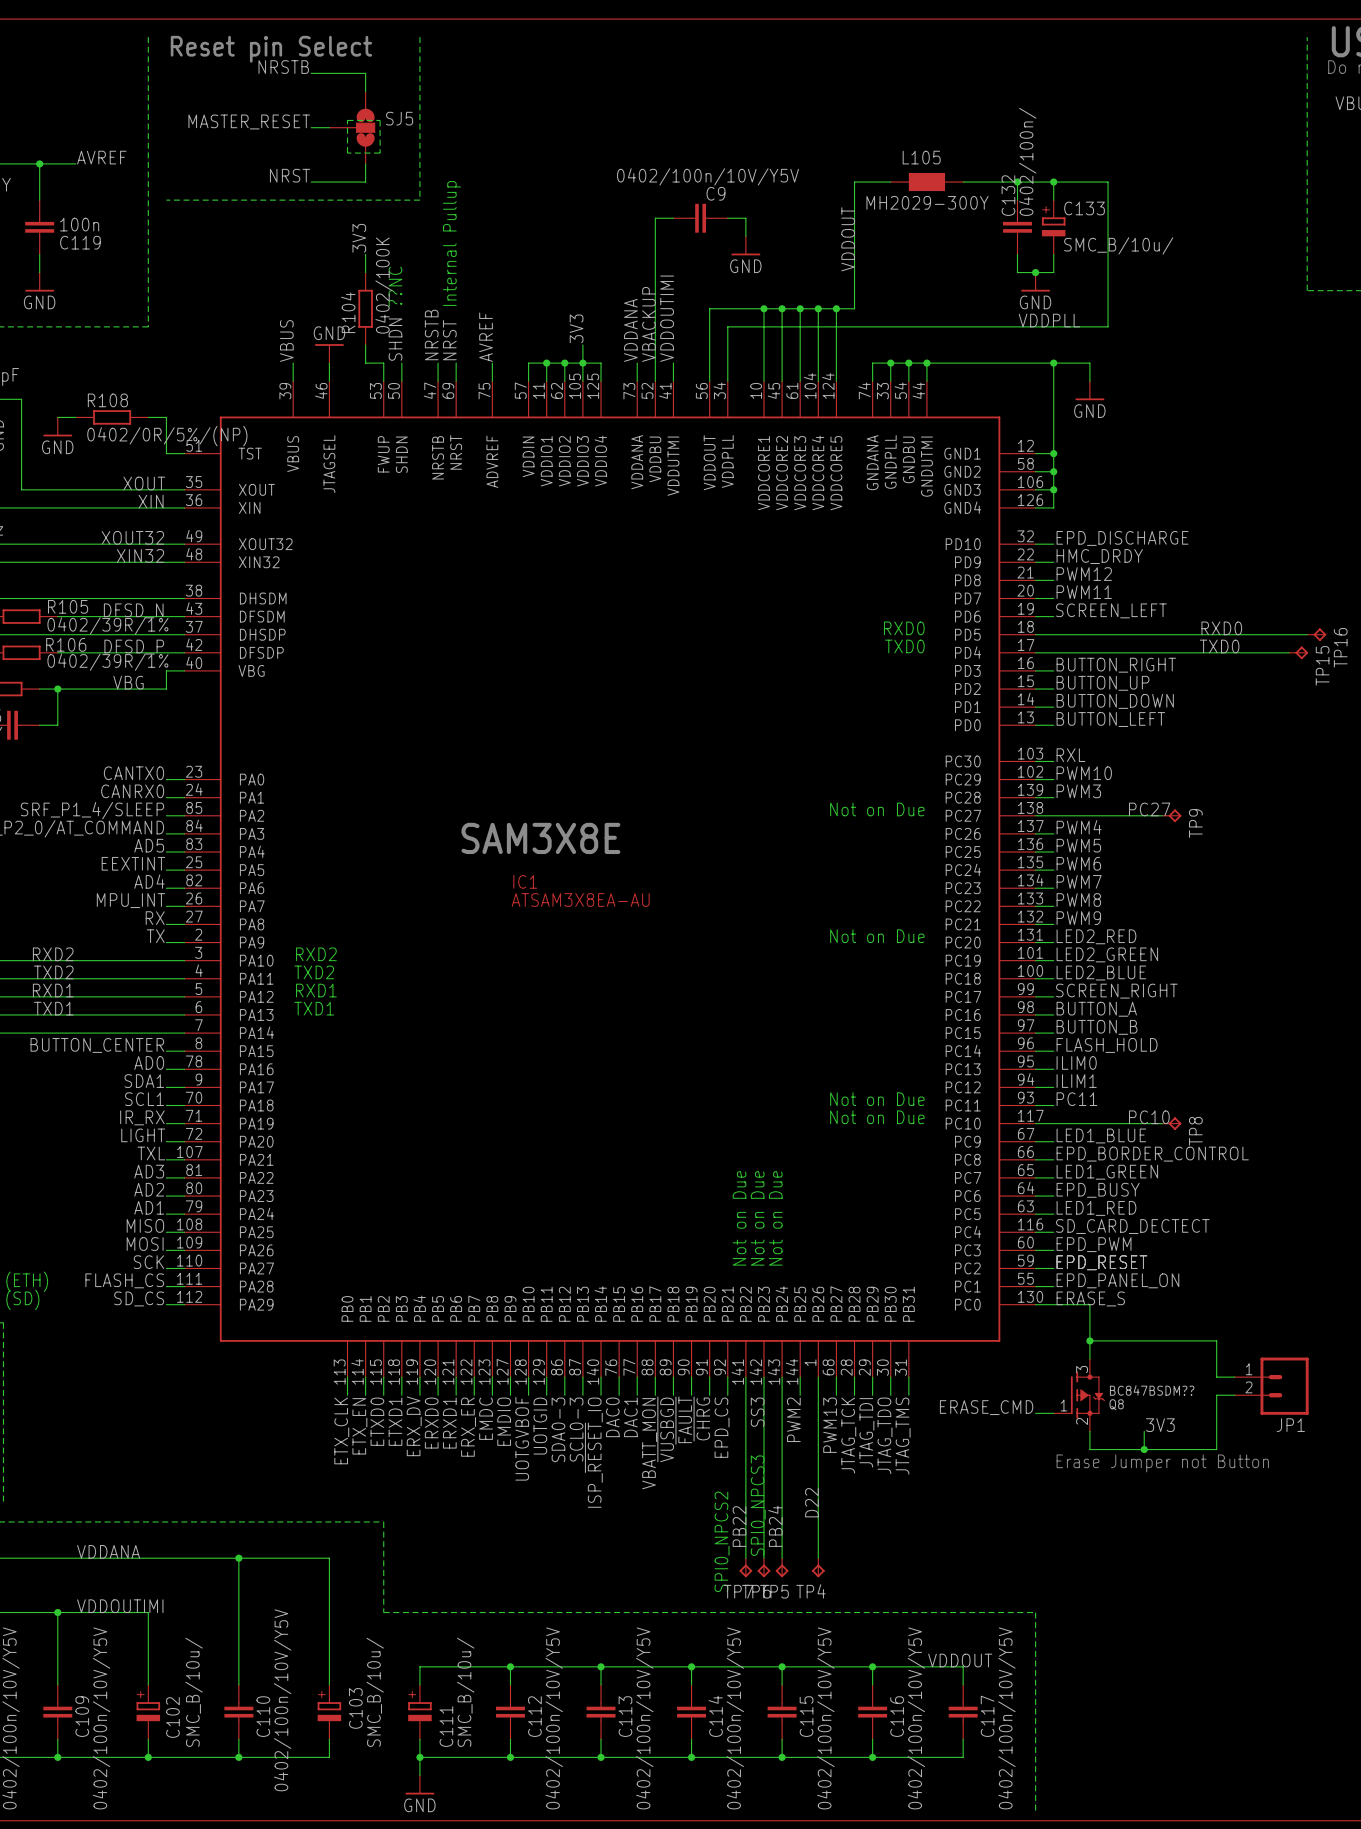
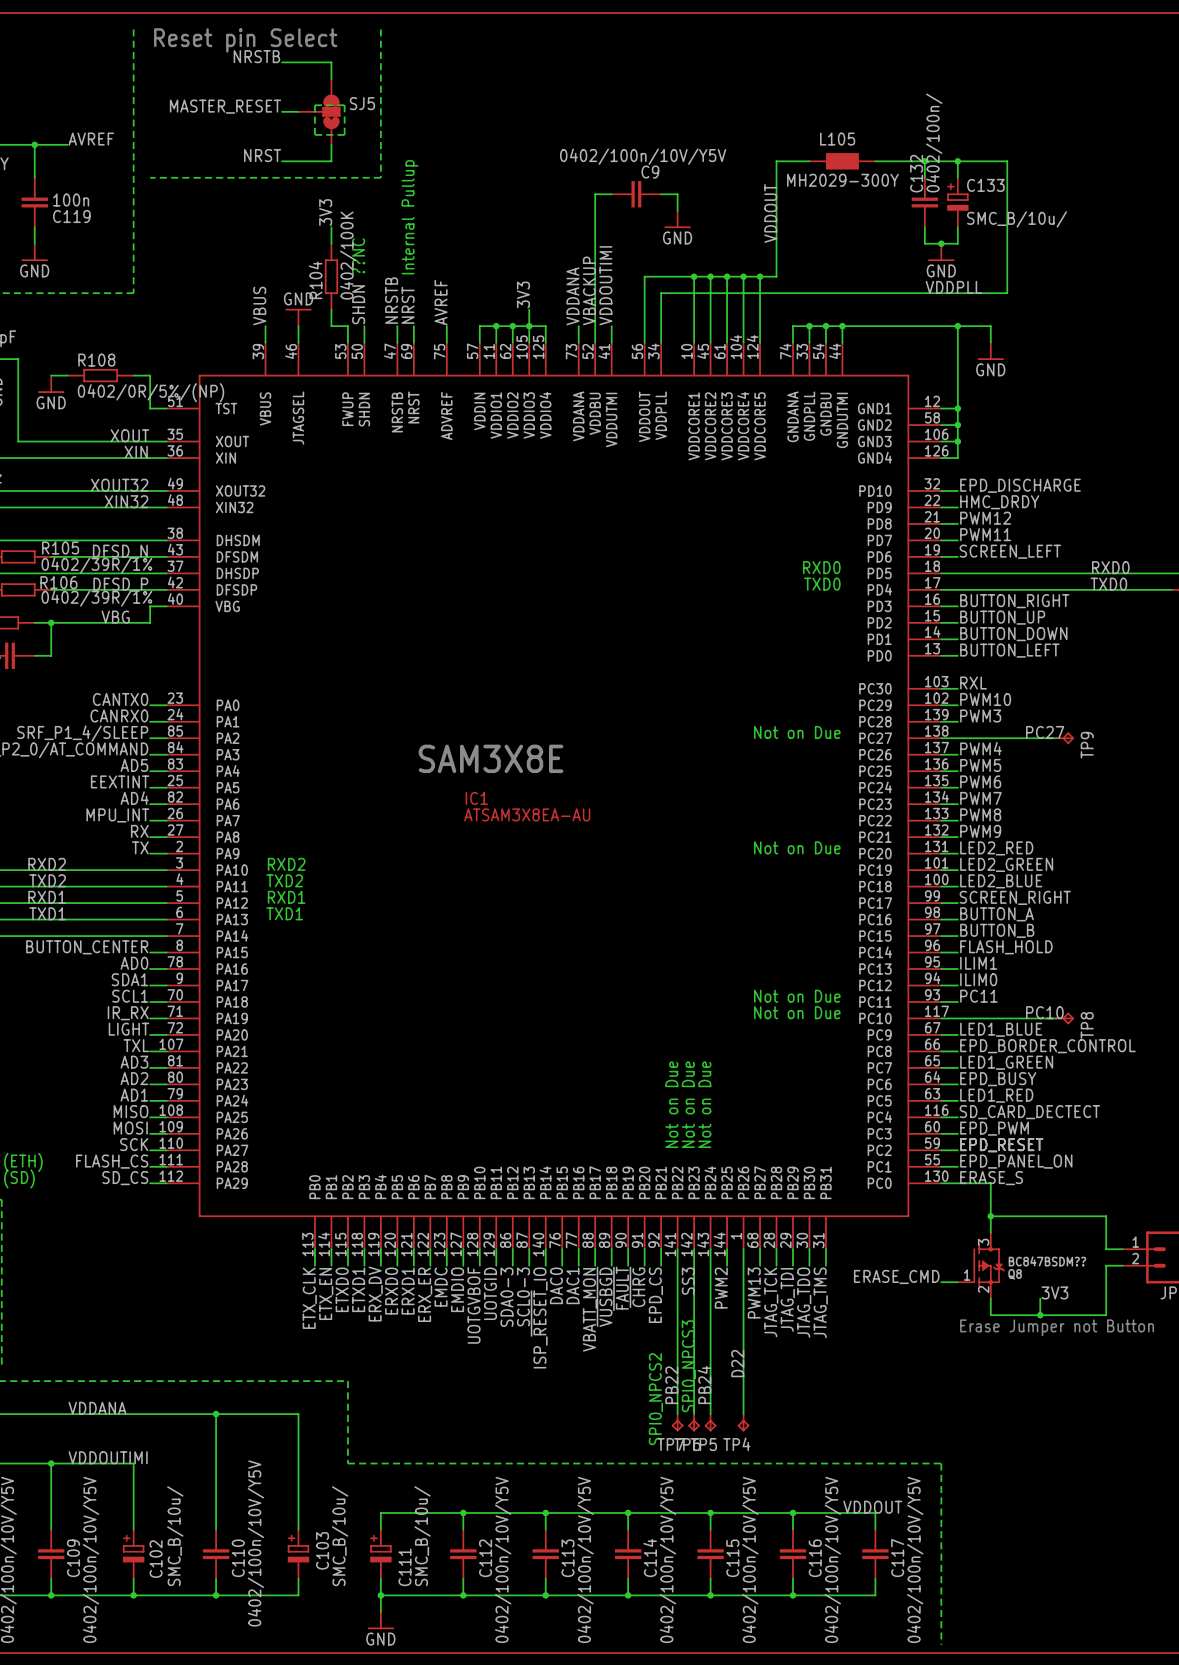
label: ILIM0 (1076, 1062) -> ILIM1 (978, 963)
label: ILIM1 (1076, 1081) -> ILIM0 (978, 979)

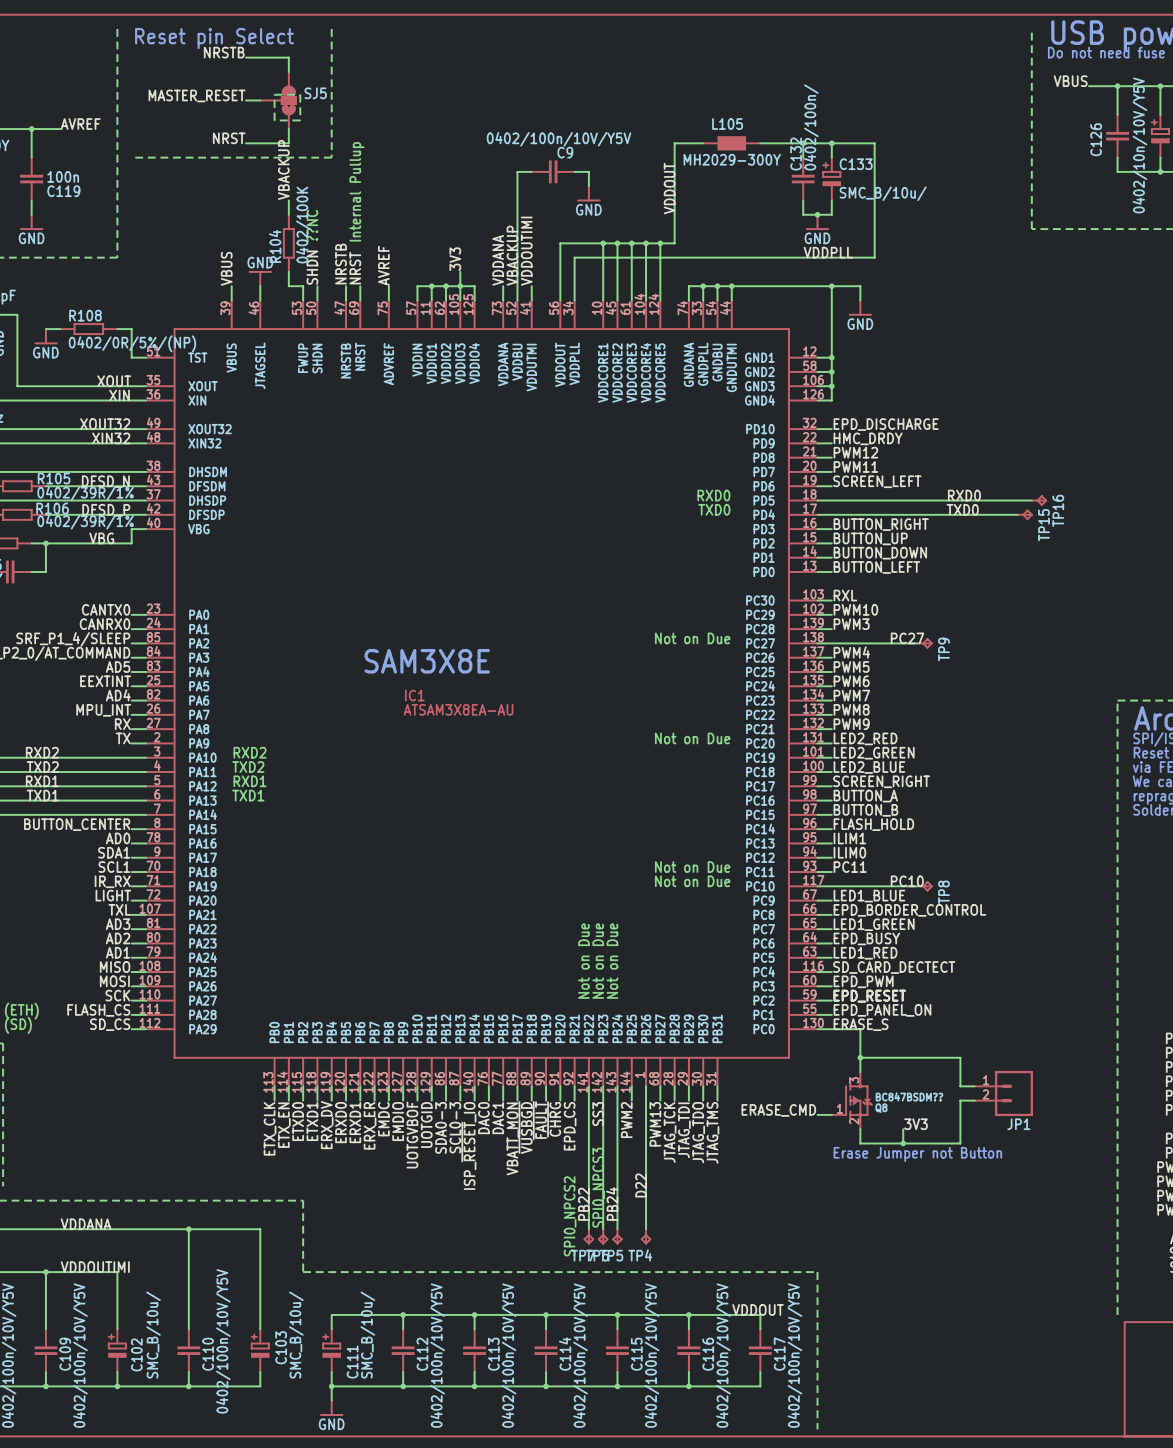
label: 3V3 (325, 212) -> VBACKUP (283, 169)

